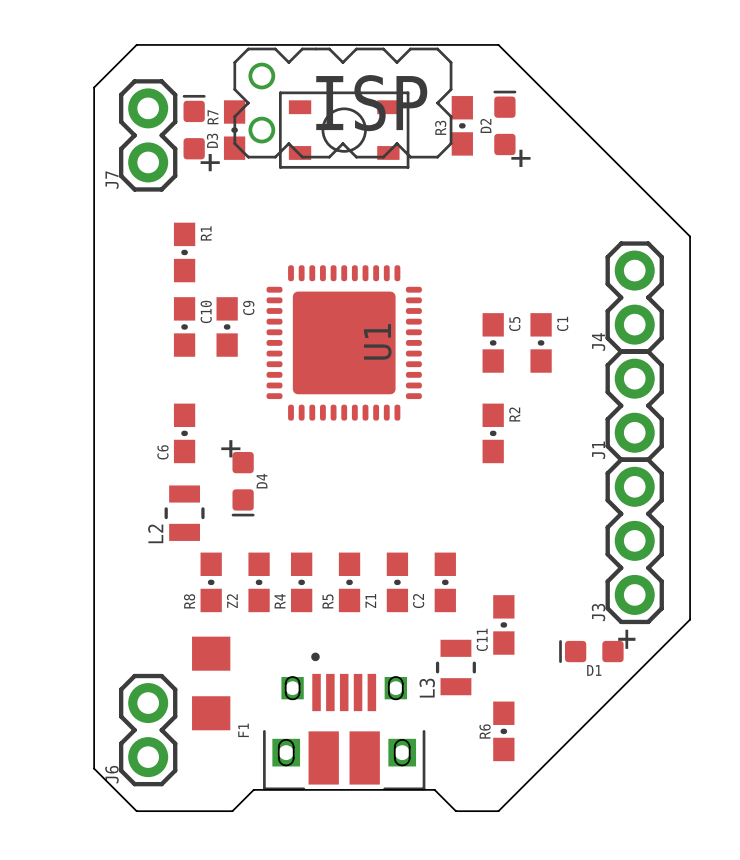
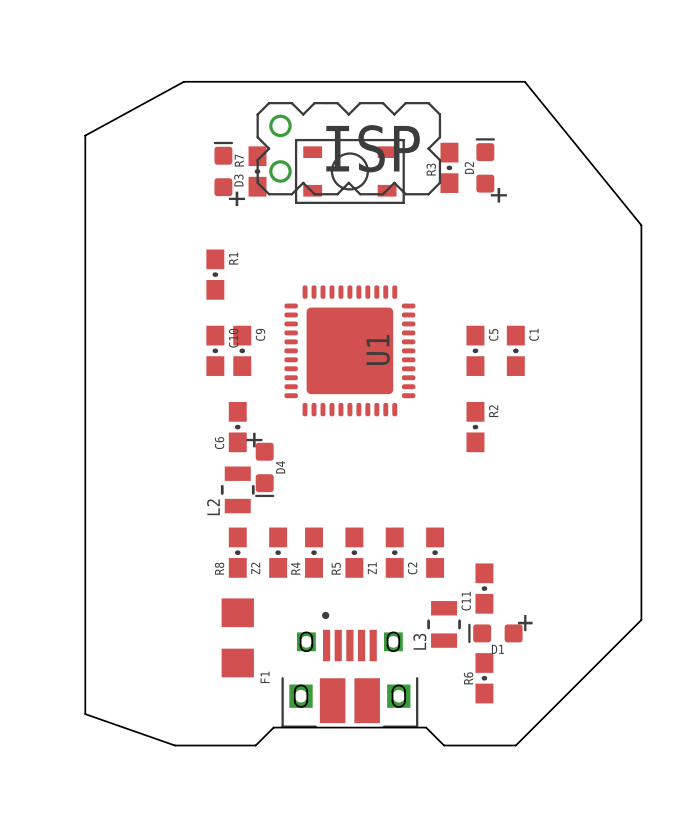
J7: (148, 135) -> none
board edge: (690, 236) (498, 44) (136, 44) (94, 87) (94, 768) (136, 811) -> (641, 261) (641, 225) (524, 81) (183, 81) (85, 135) (85, 714) (174, 745)
J4: (634, 297) -> none
C10 position: (184, 326) -> (215, 350)
C9 position: (227, 326) -> (242, 350)
J1: (634, 405) -> none
C6 position: (184, 433) -> (237, 427)
L2 position: (184, 513) -> (237, 489)
J3: (634, 540) -> none
board edge: (690, 619) (498, 811) -> (641, 584) (641, 619) (515, 745) (479, 745)
D1 position: (591, 651) -> (495, 633)
J6: (148, 730) -> none

